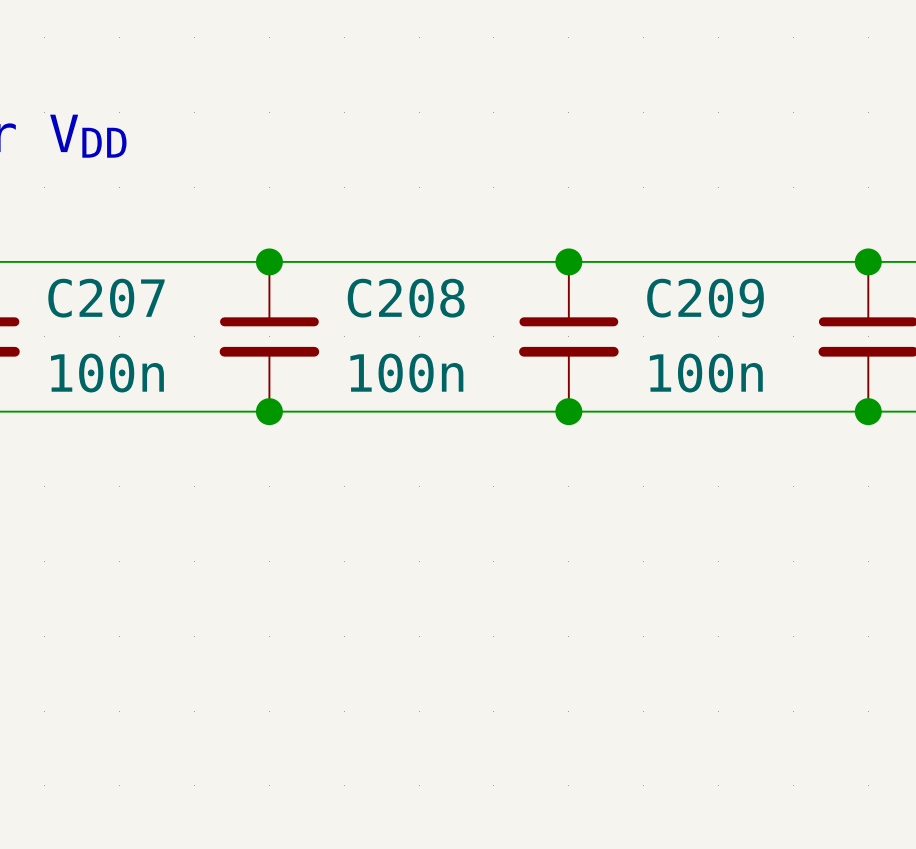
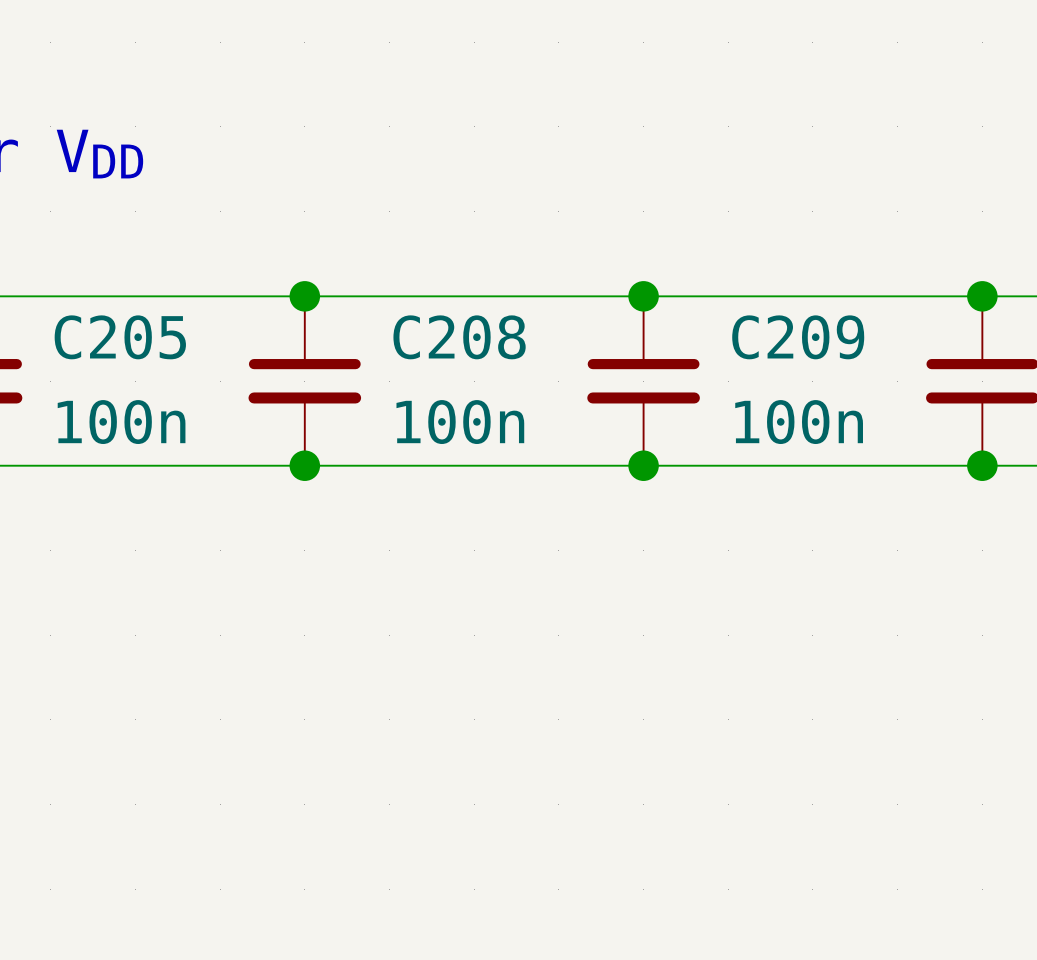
C207 name: C207 (106, 298) -> C205 (120, 337)

